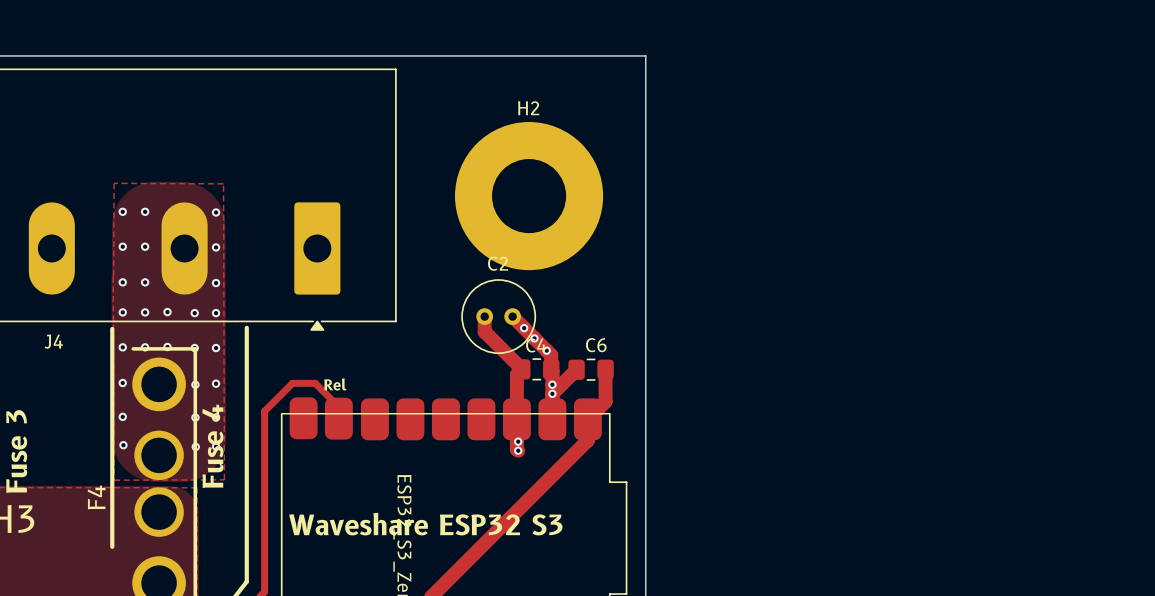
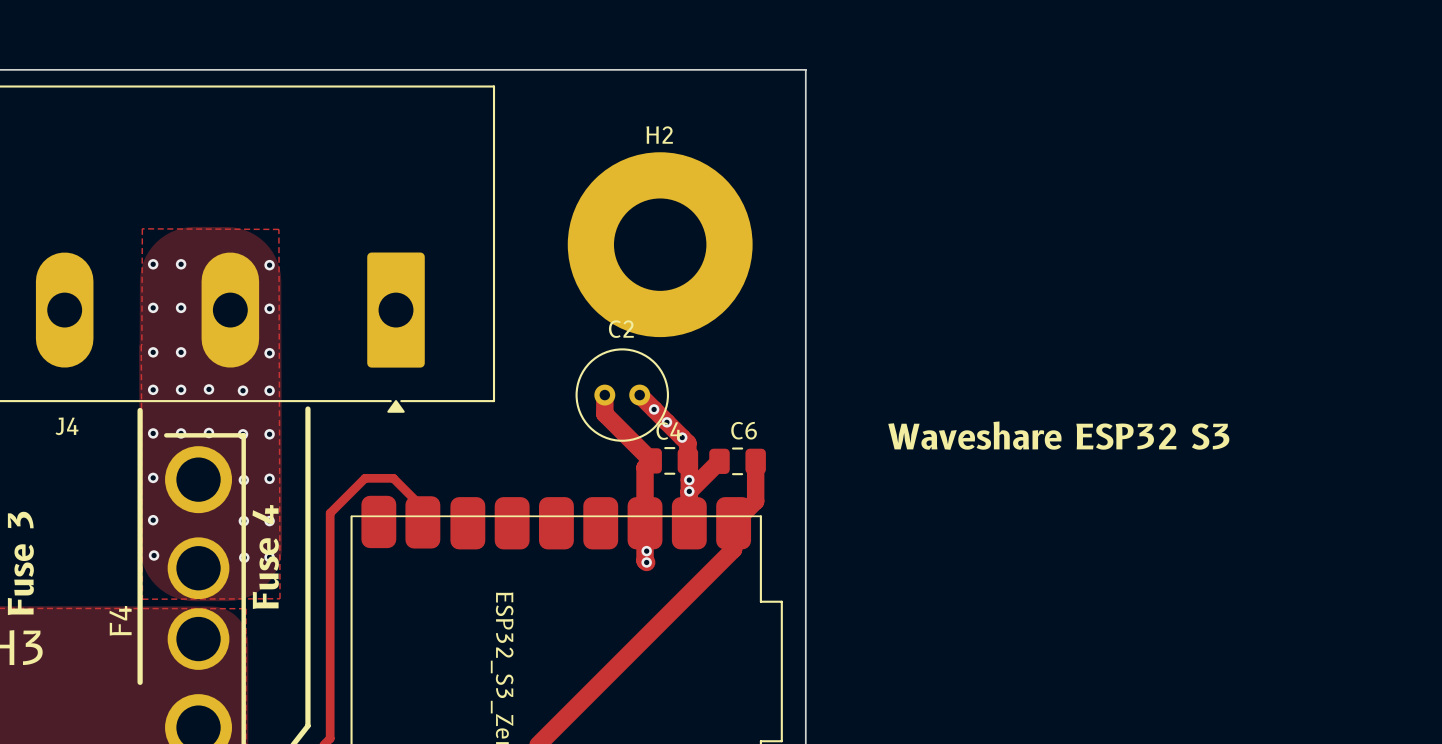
text: none -> Waveshare ESP32 S3 (1058, 435)
text: Rel (335, 384) -> none
text: Waveshare ESP32 S3 (425, 524) -> none

